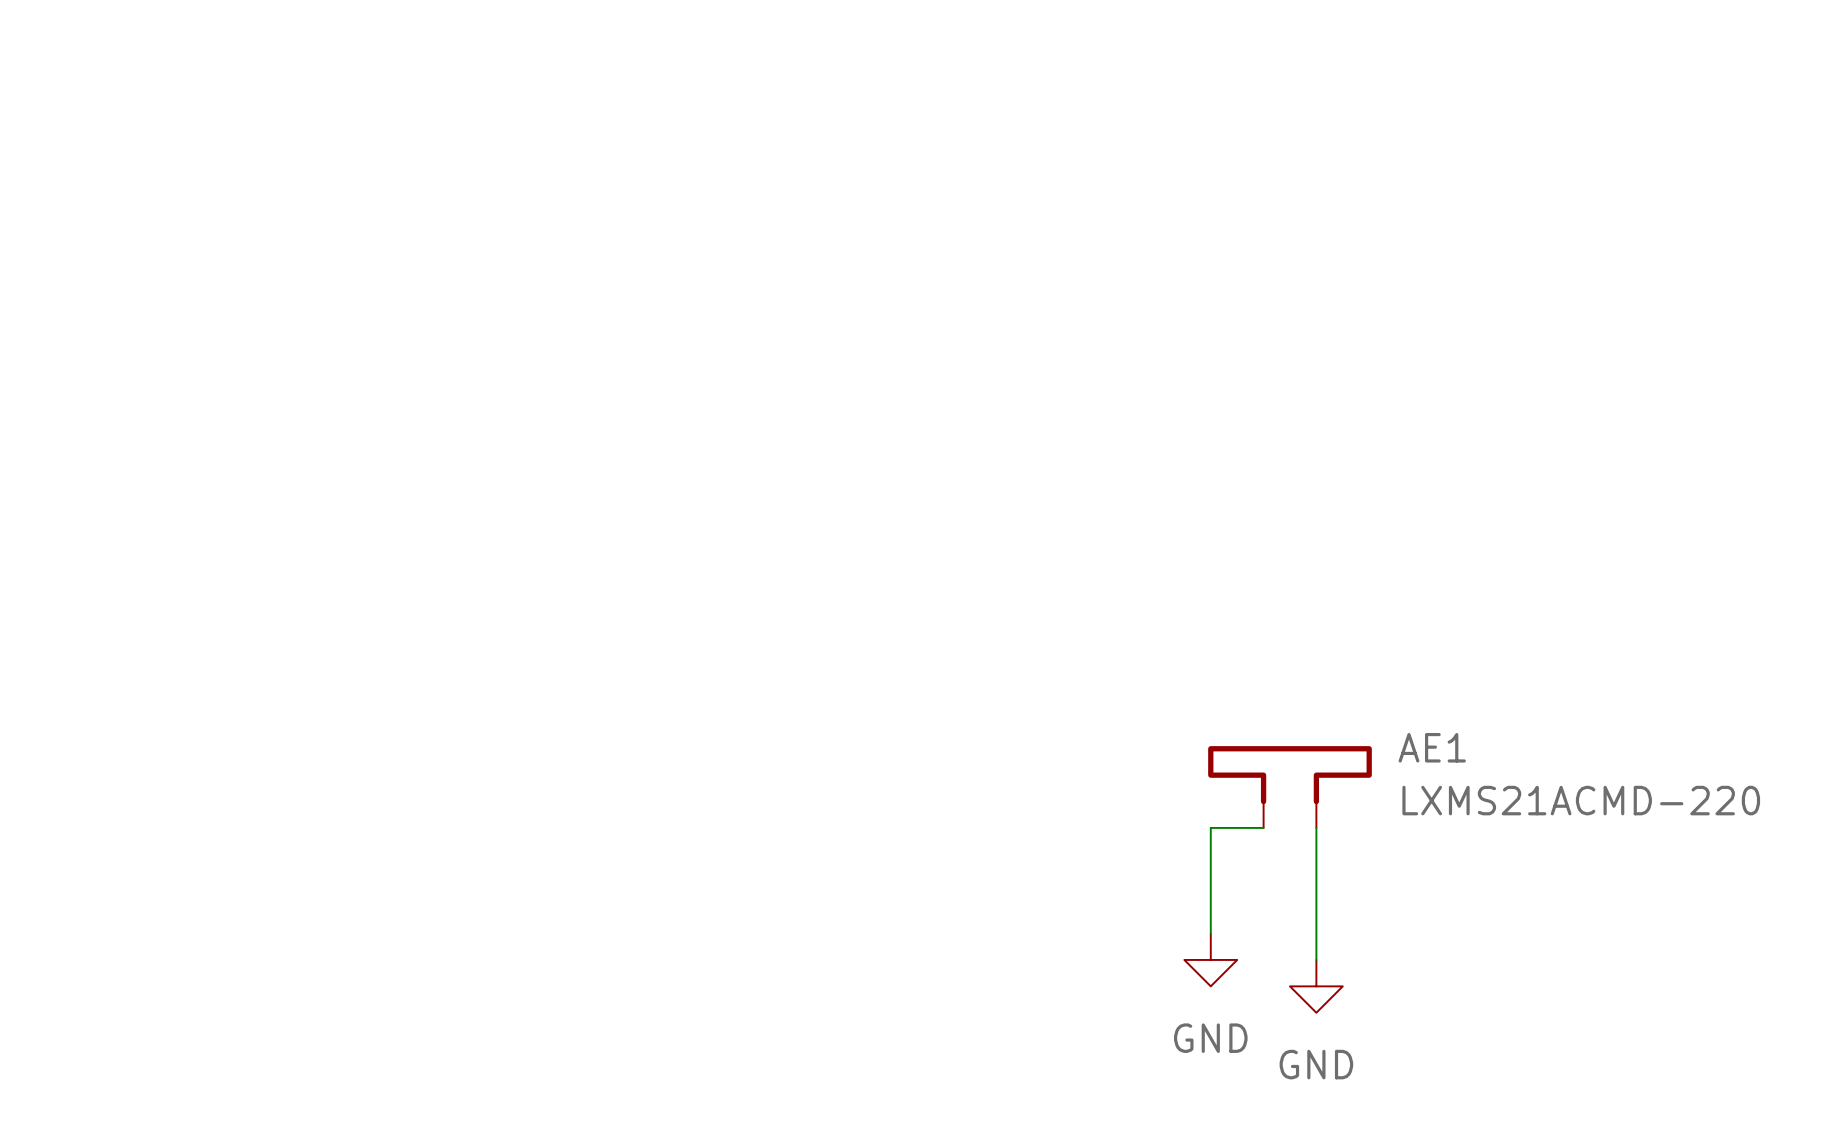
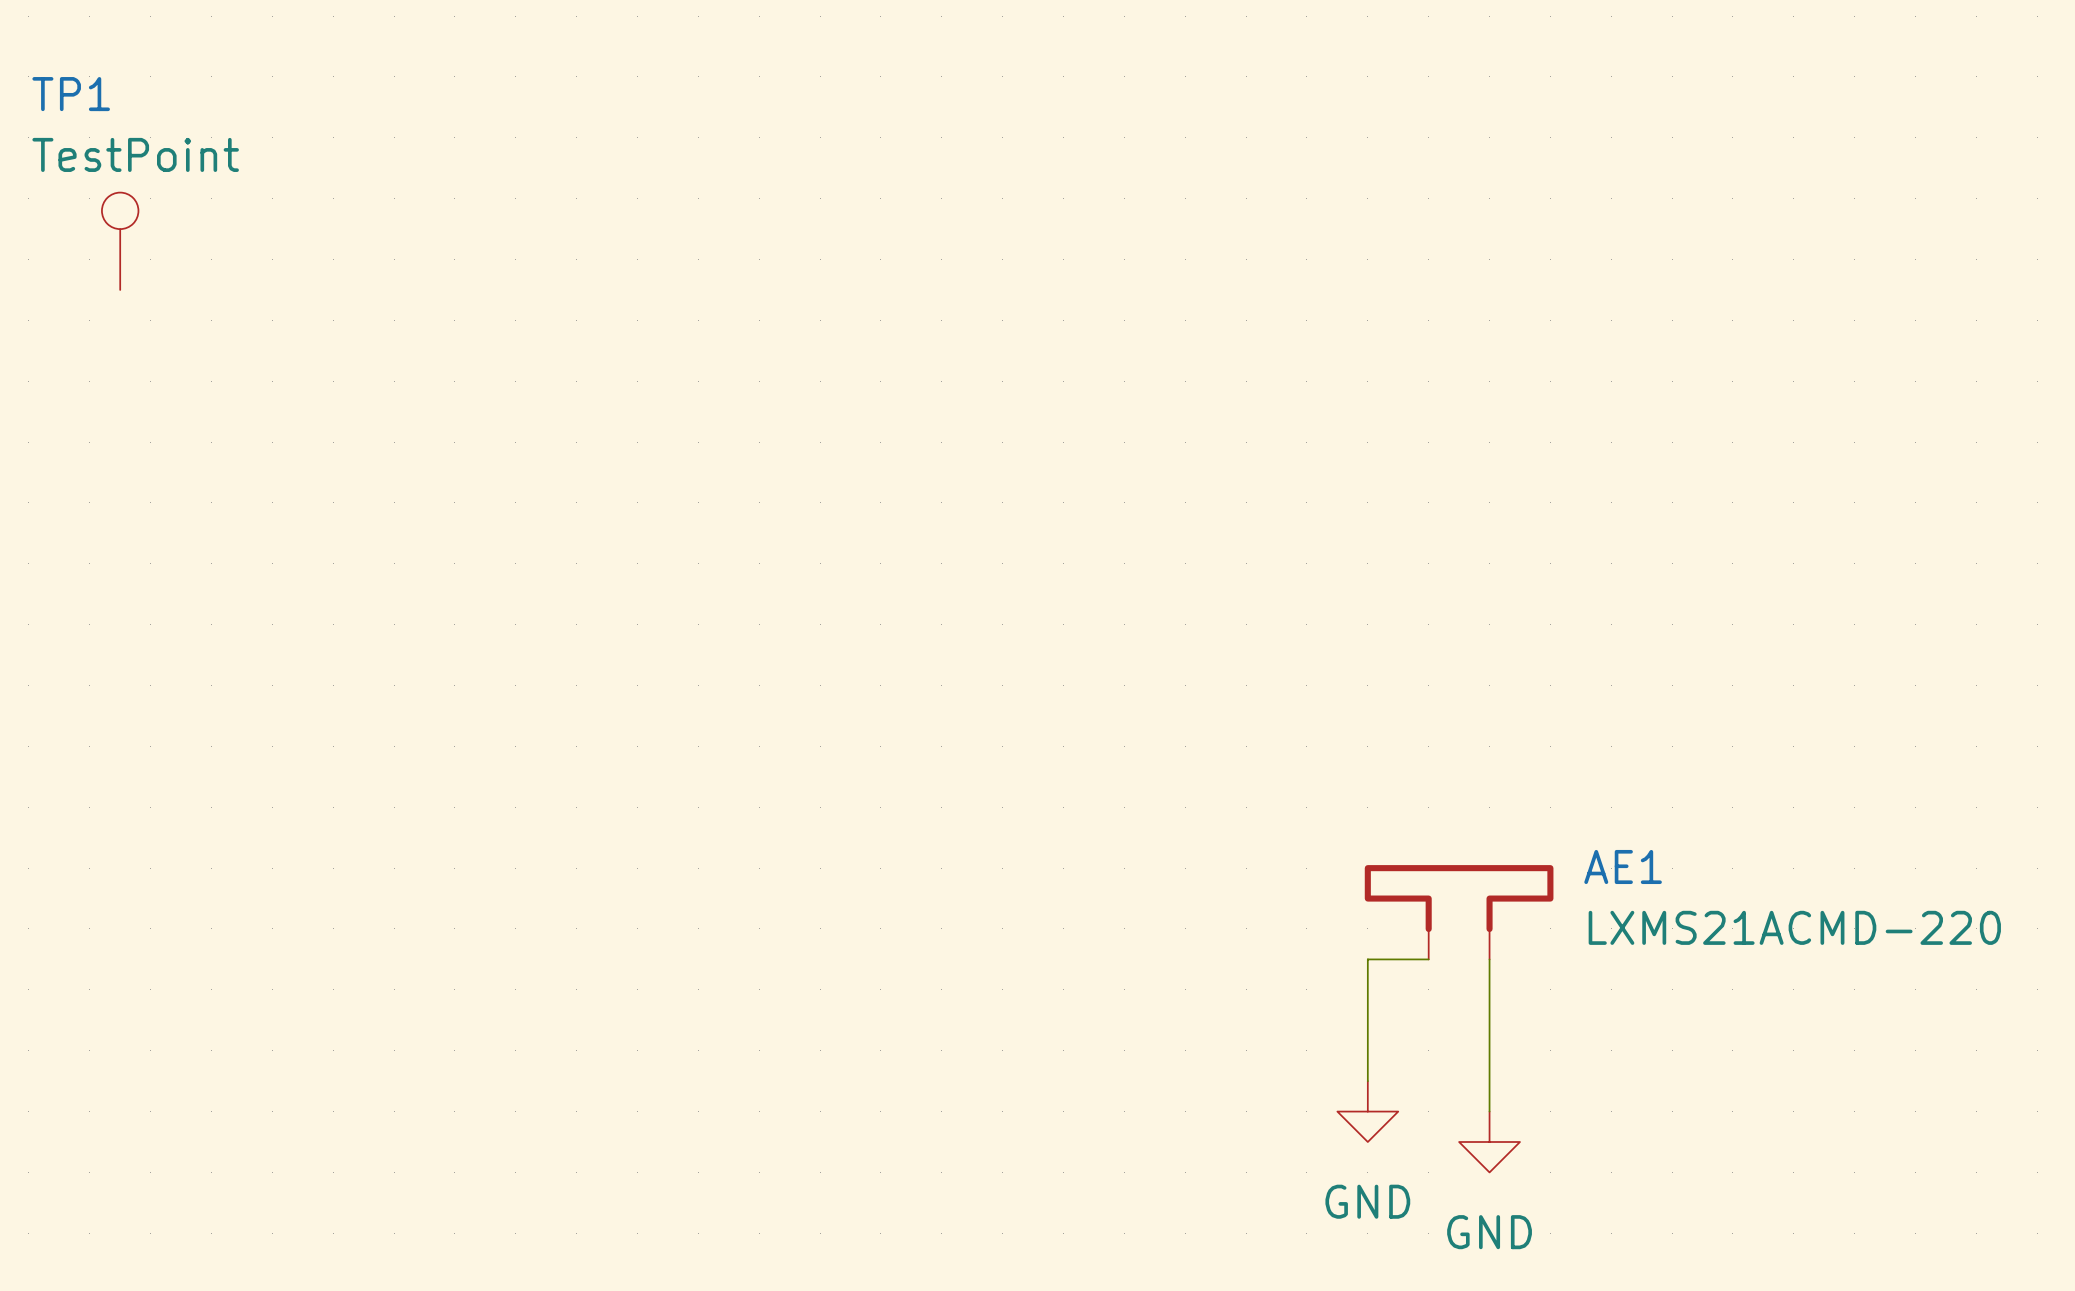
TP1: none -> TestPoint (120, 241)

